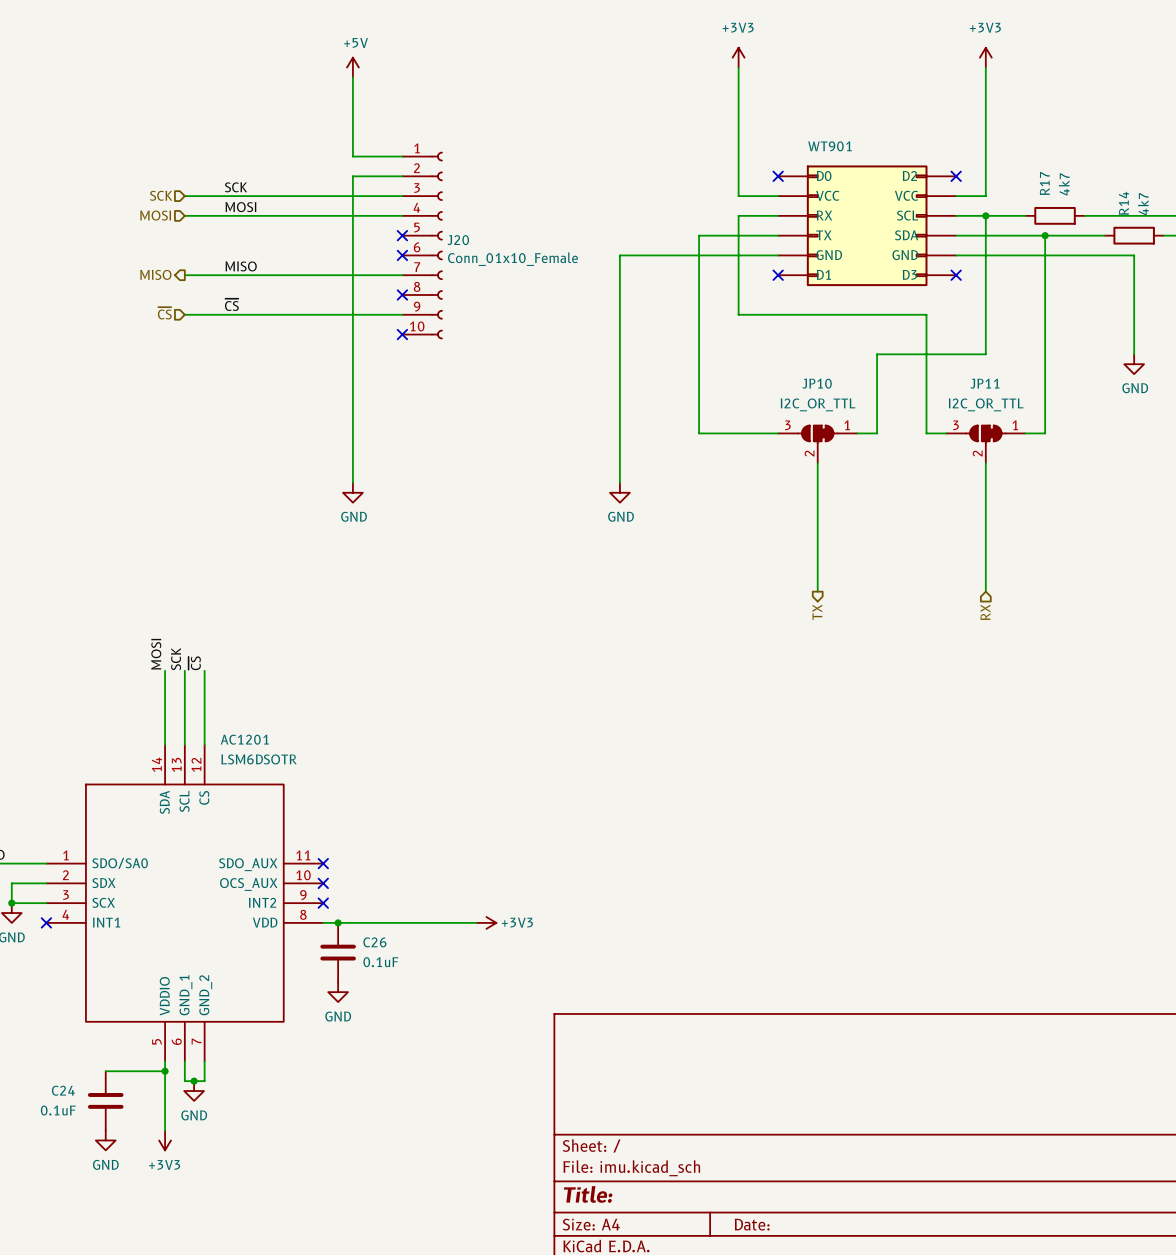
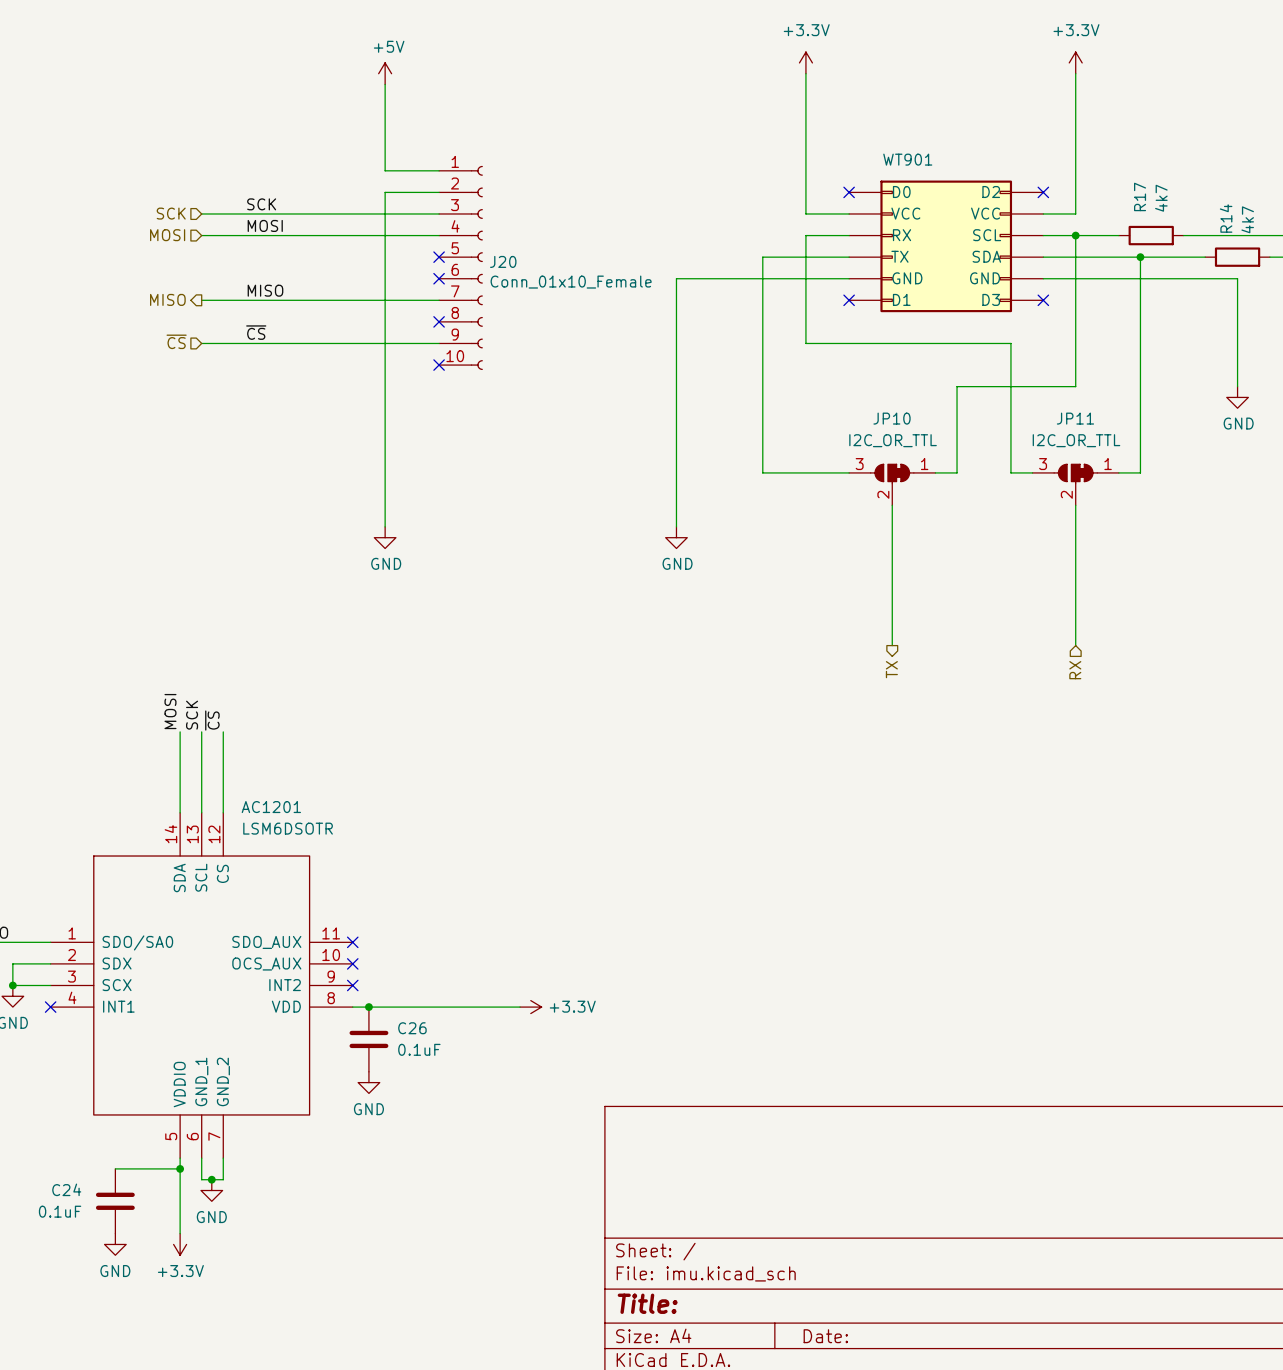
power symbol: +3V3 (738, 57) -> +3.3V (805, 62)
power symbol: +3V3 (985, 57) -> +3.3V (1075, 62)
power symbol: +3V3 (486, 922) -> +3.3V (530, 1007)
power symbol: +3V3 (165, 1140) -> +3.3V (180, 1244)

